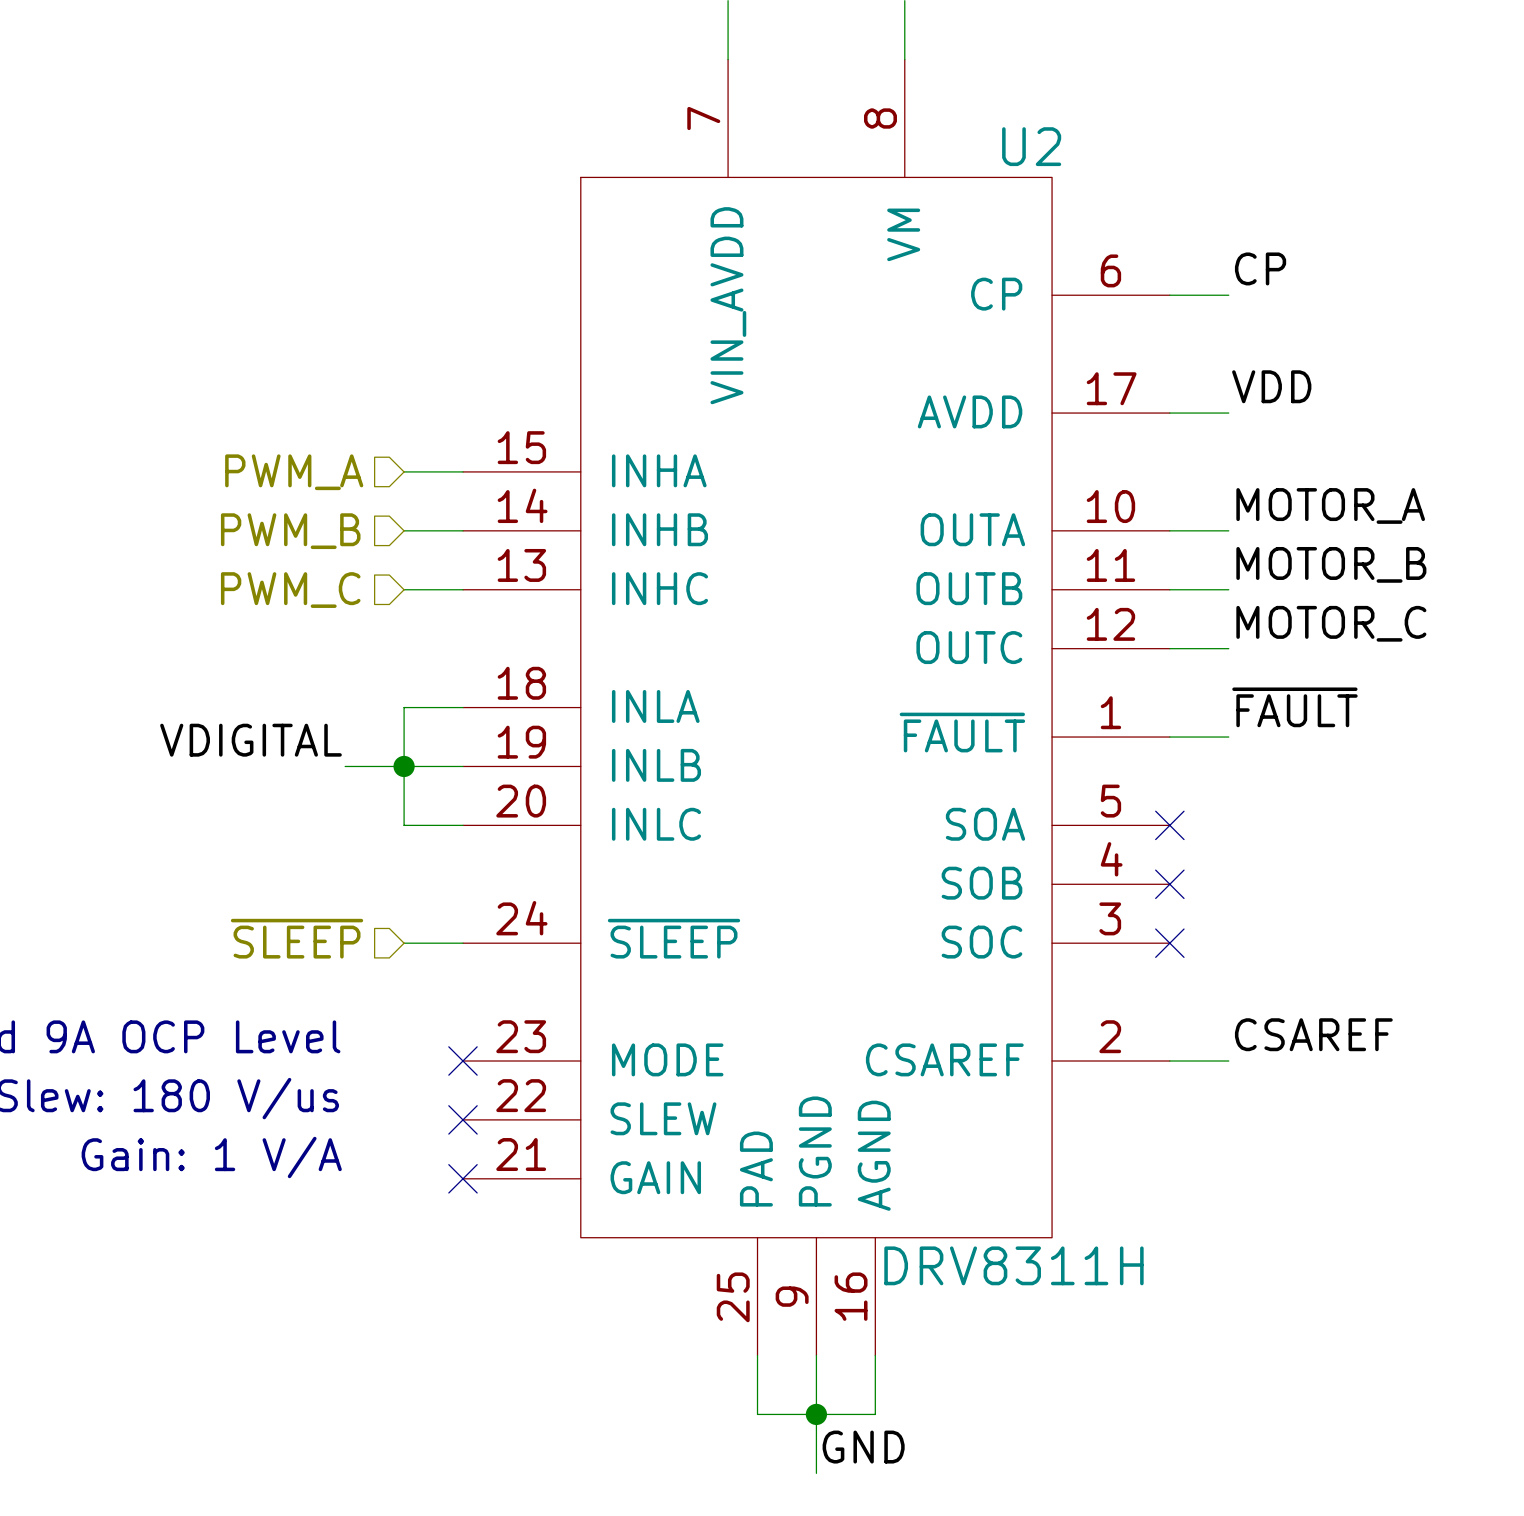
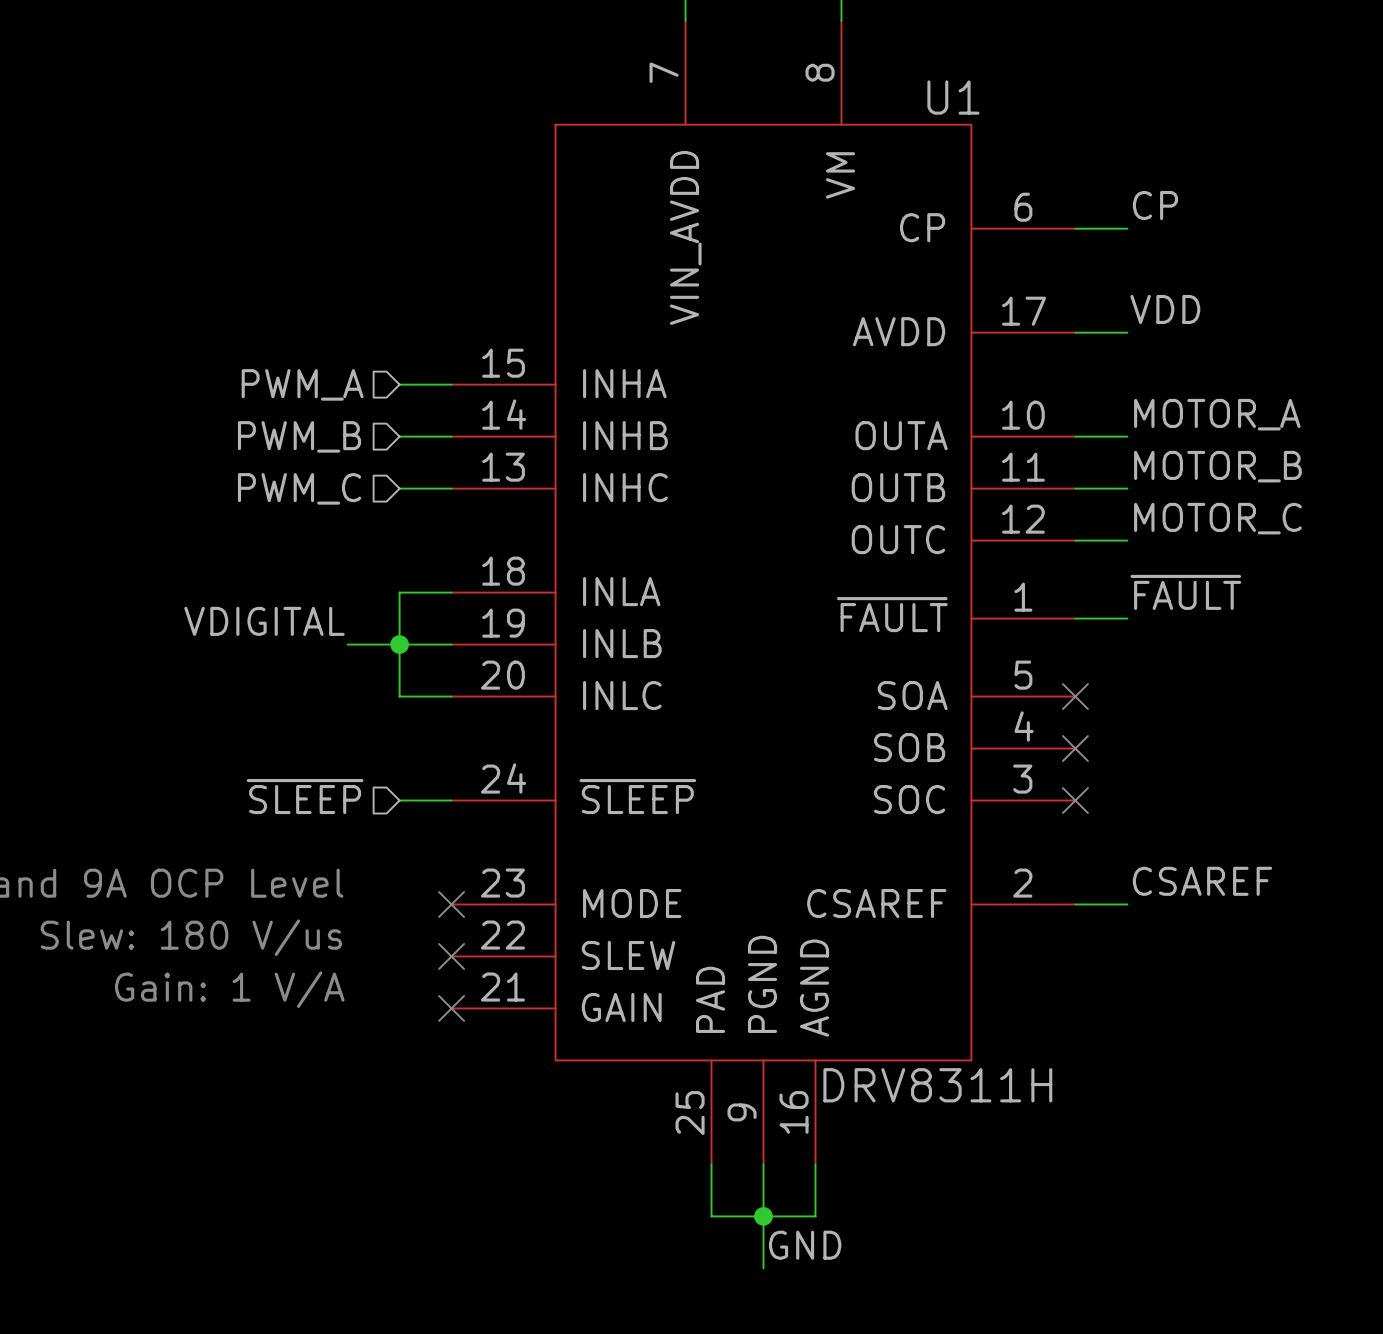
U2 name: U2 (1031, 146) -> U1 (953, 97)

